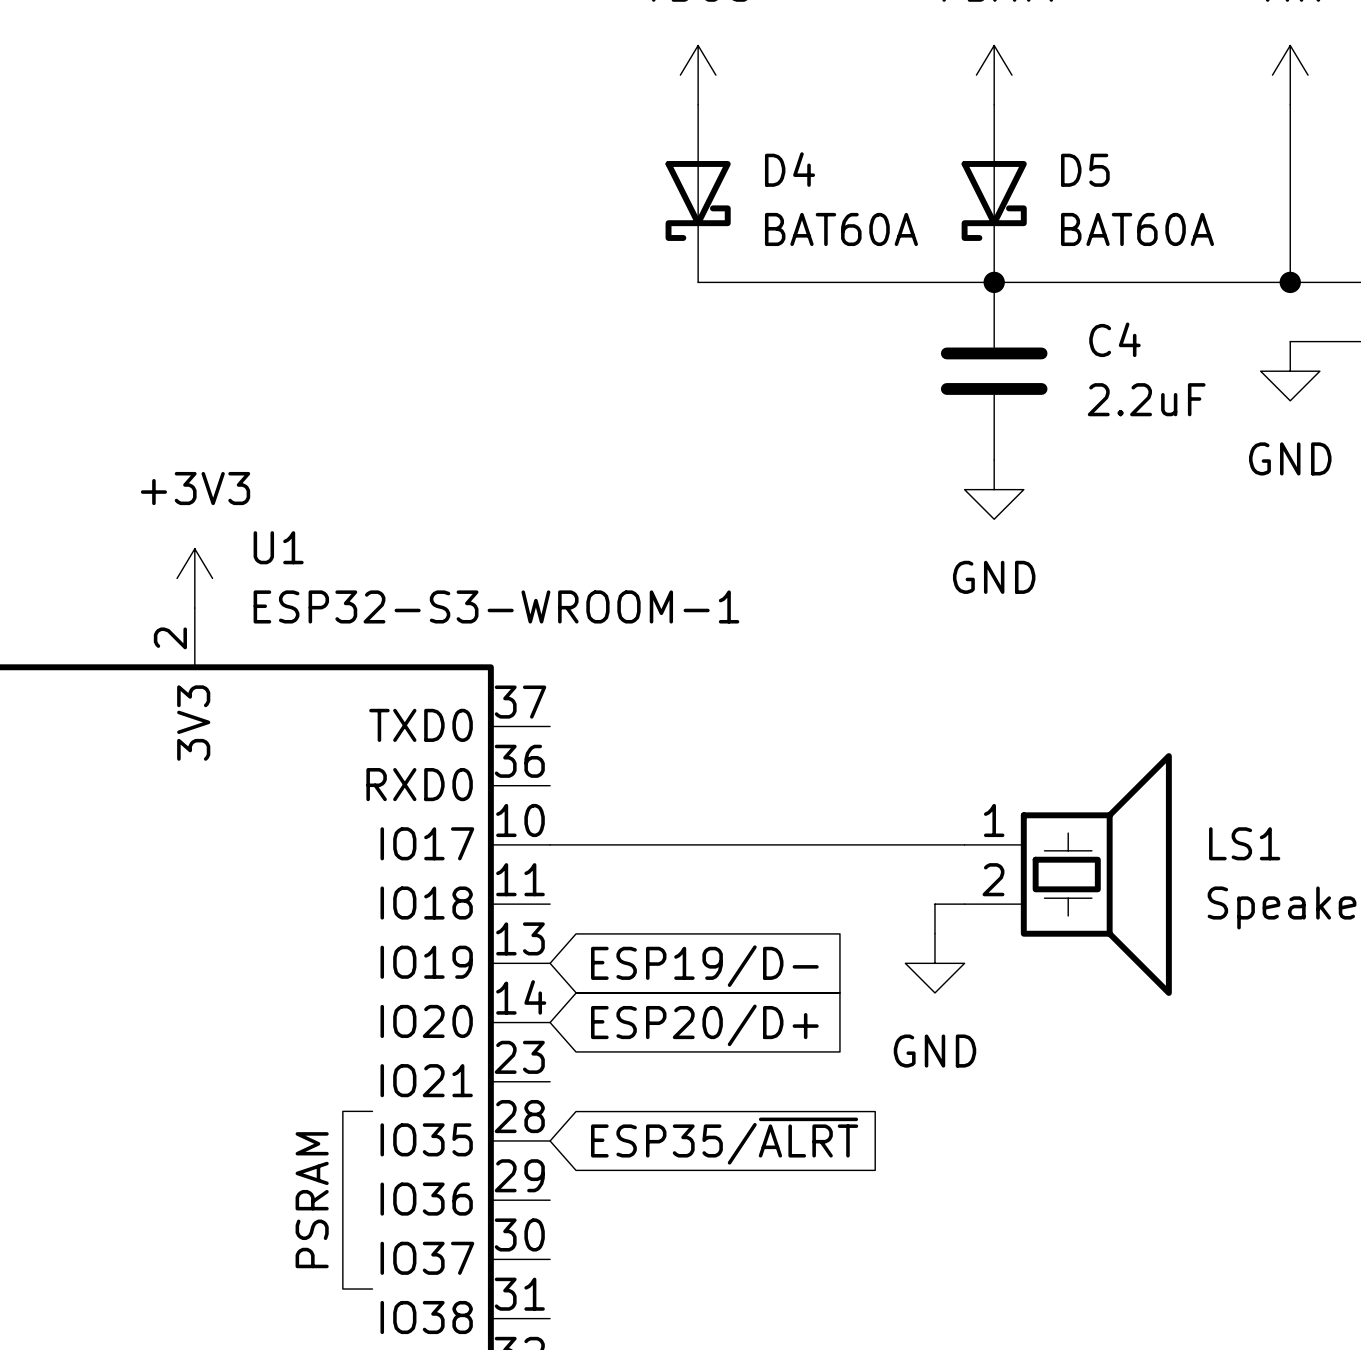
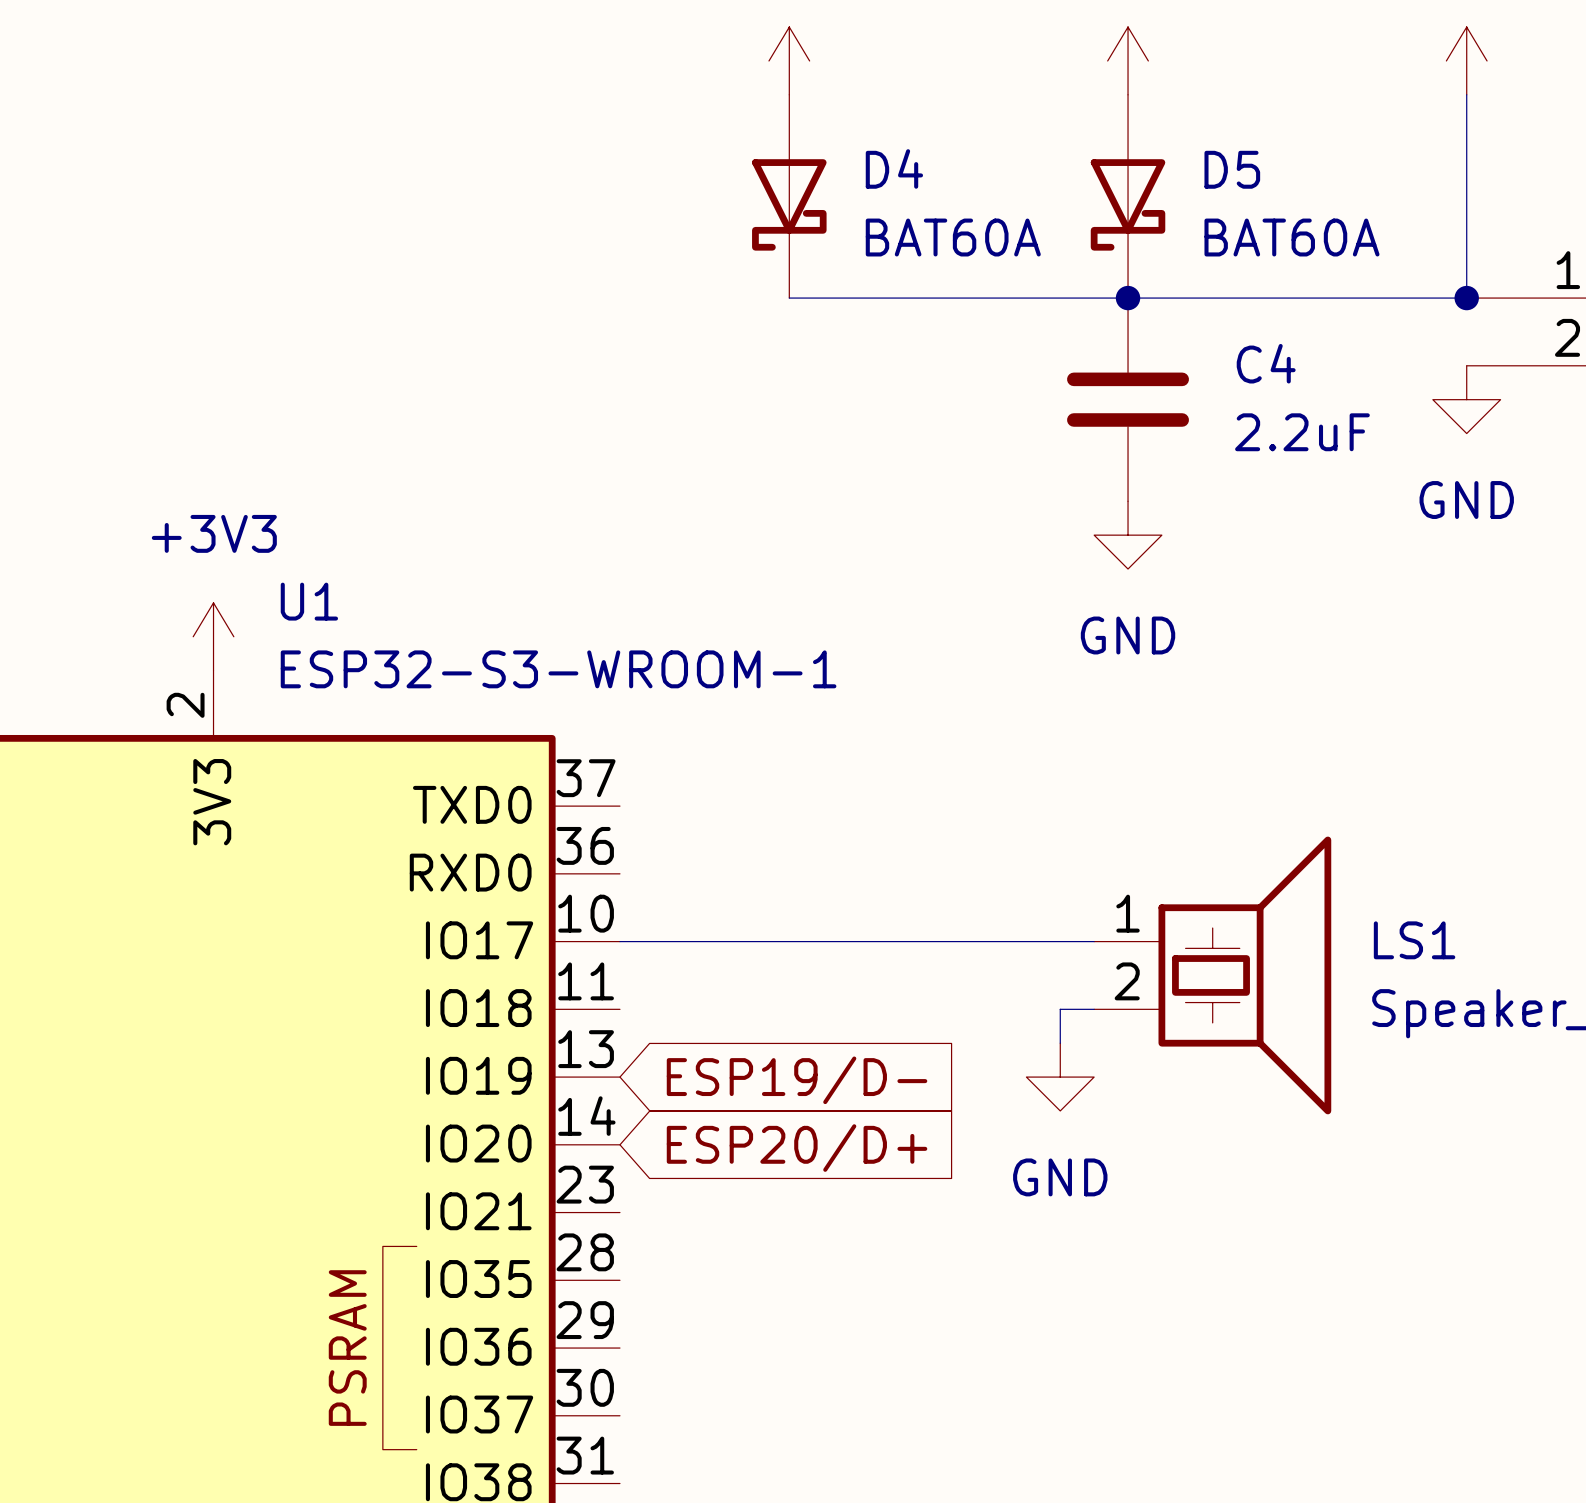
global label: ESP35/~{ALRT} (724, 1141) -> none

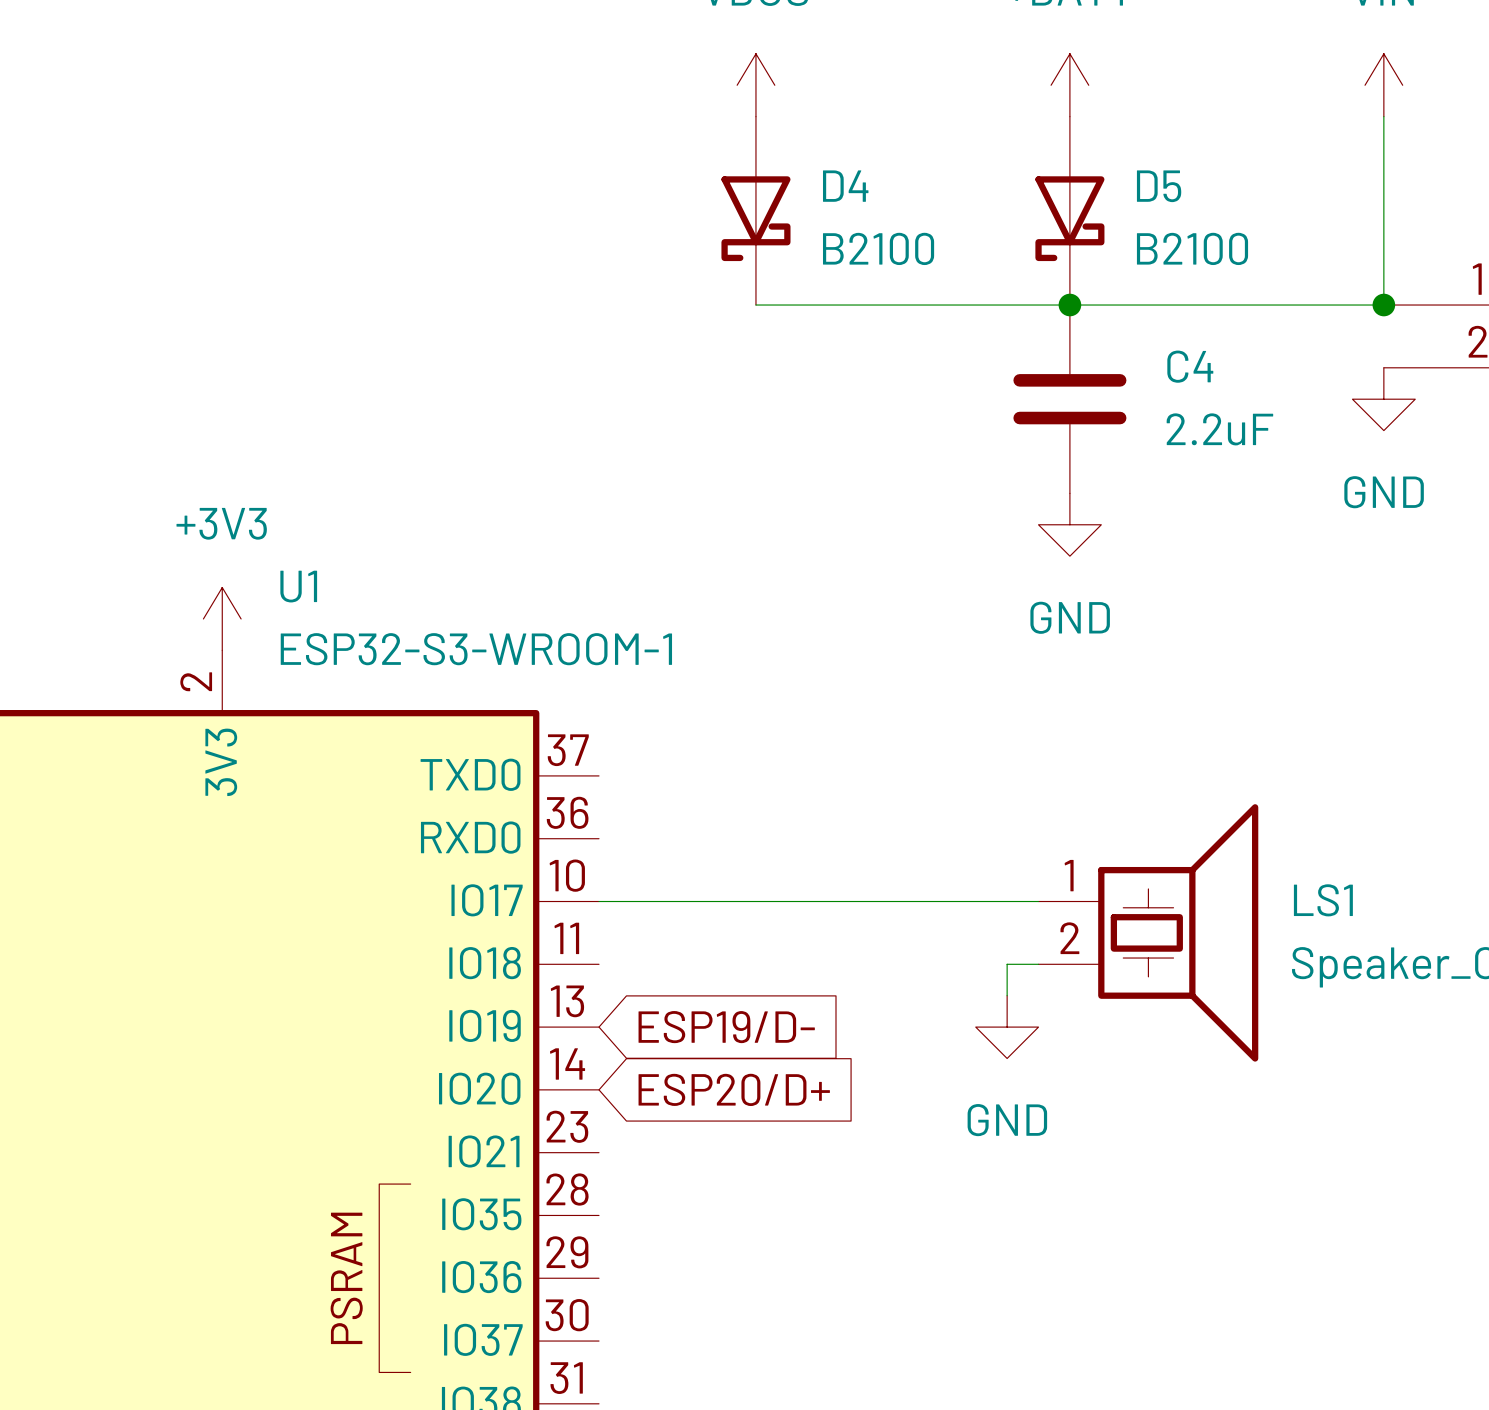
D4 value: BAT60A (953, 237) -> B2100 (878, 248)
D5 value: BAT60A (1291, 237) -> B2100 (1192, 248)

